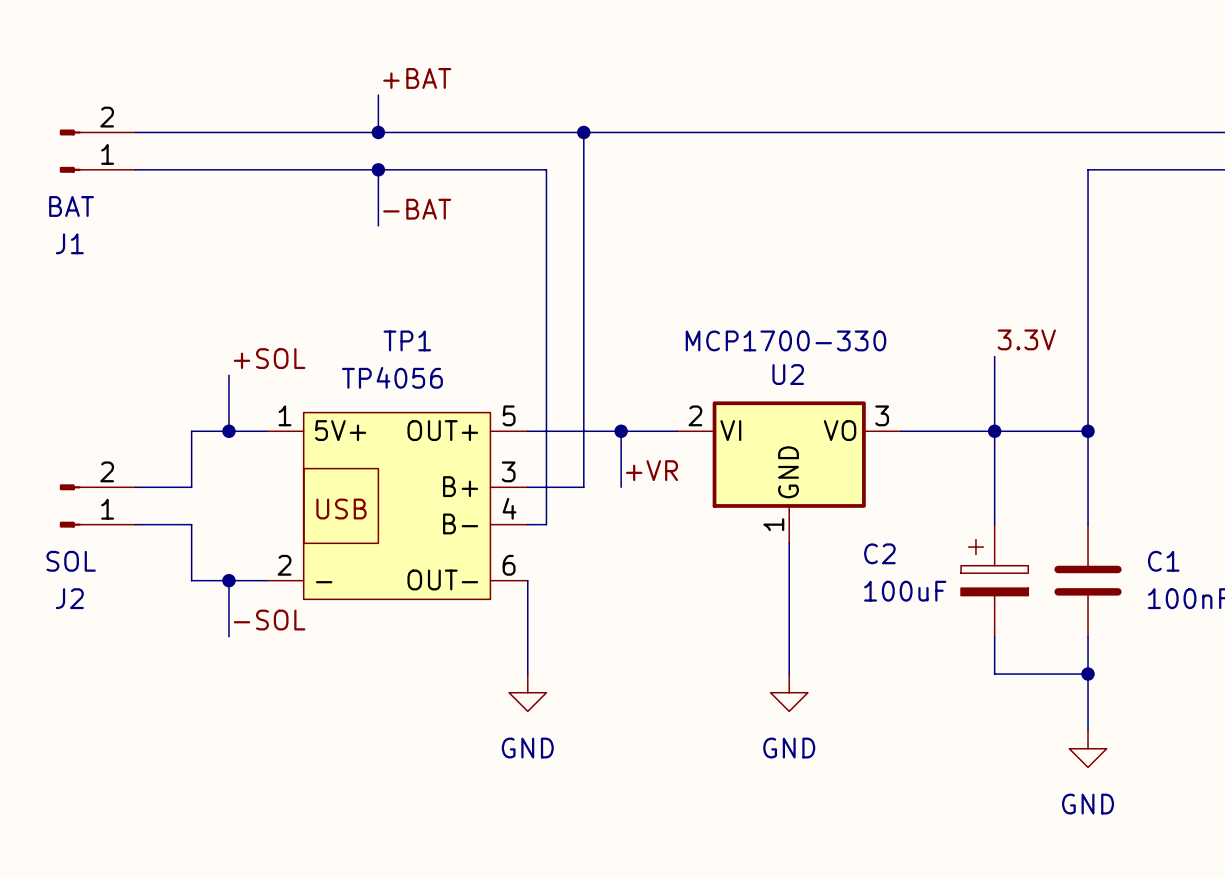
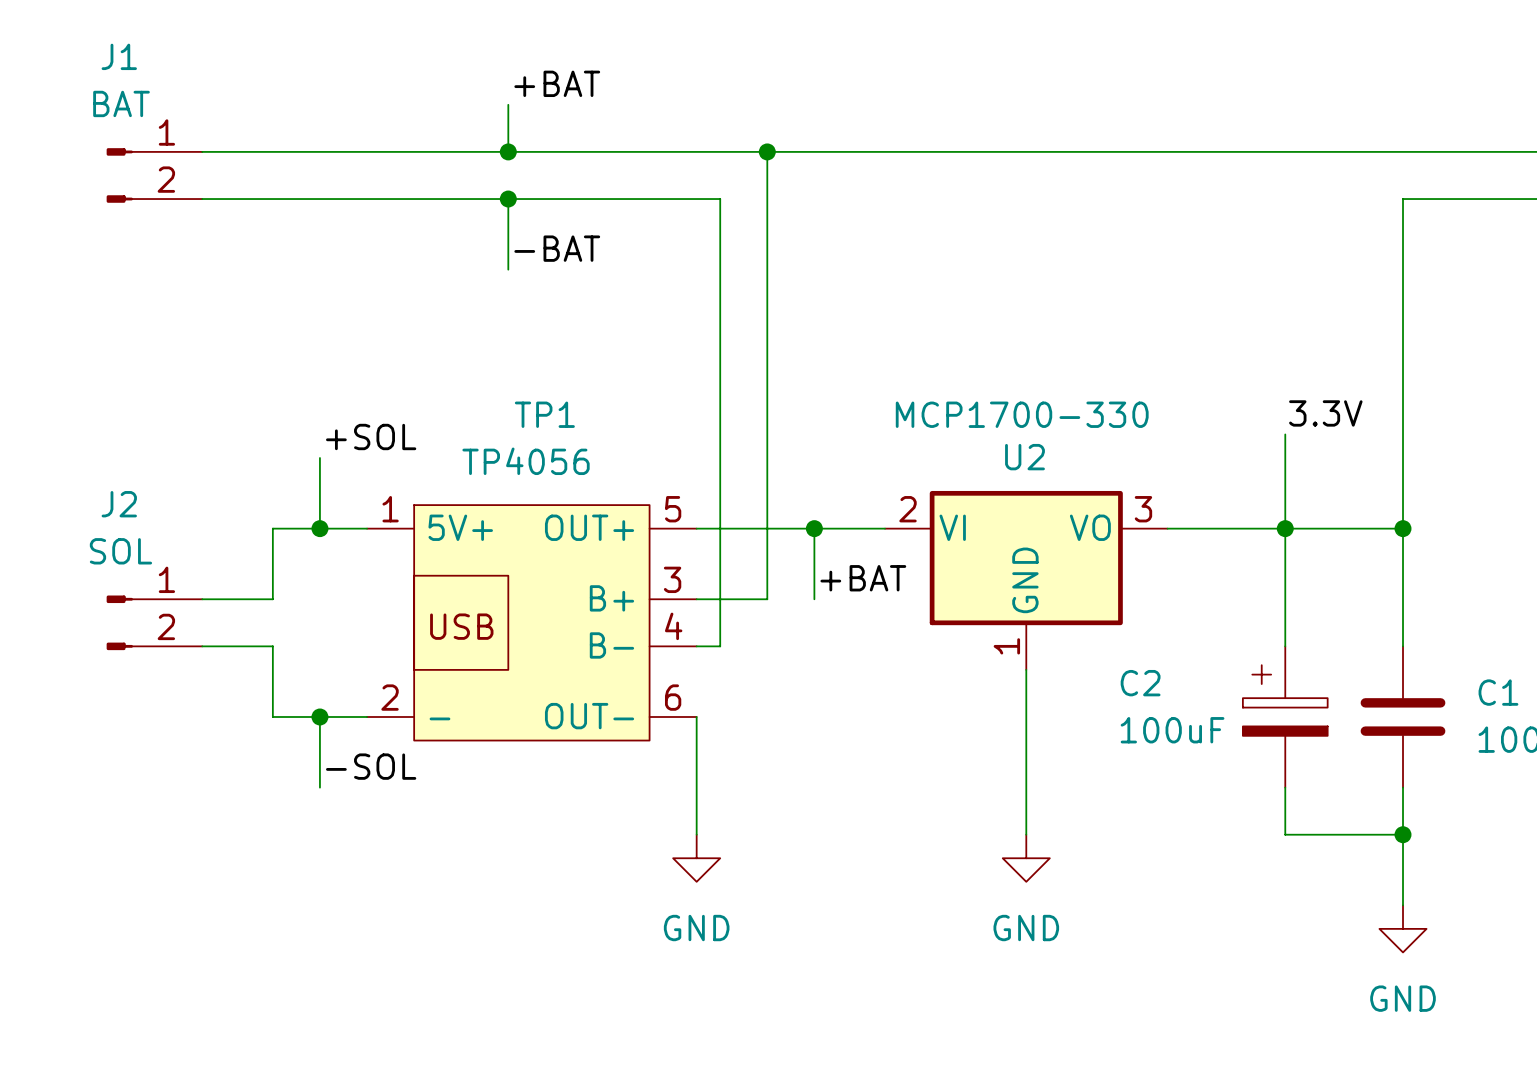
J1 flip: as is (70, 151) -> up-down (119, 175)
label: +VR (651, 470) -> +BAT (863, 578)
J2 flip: as is (70, 505) -> up-down (119, 622)

